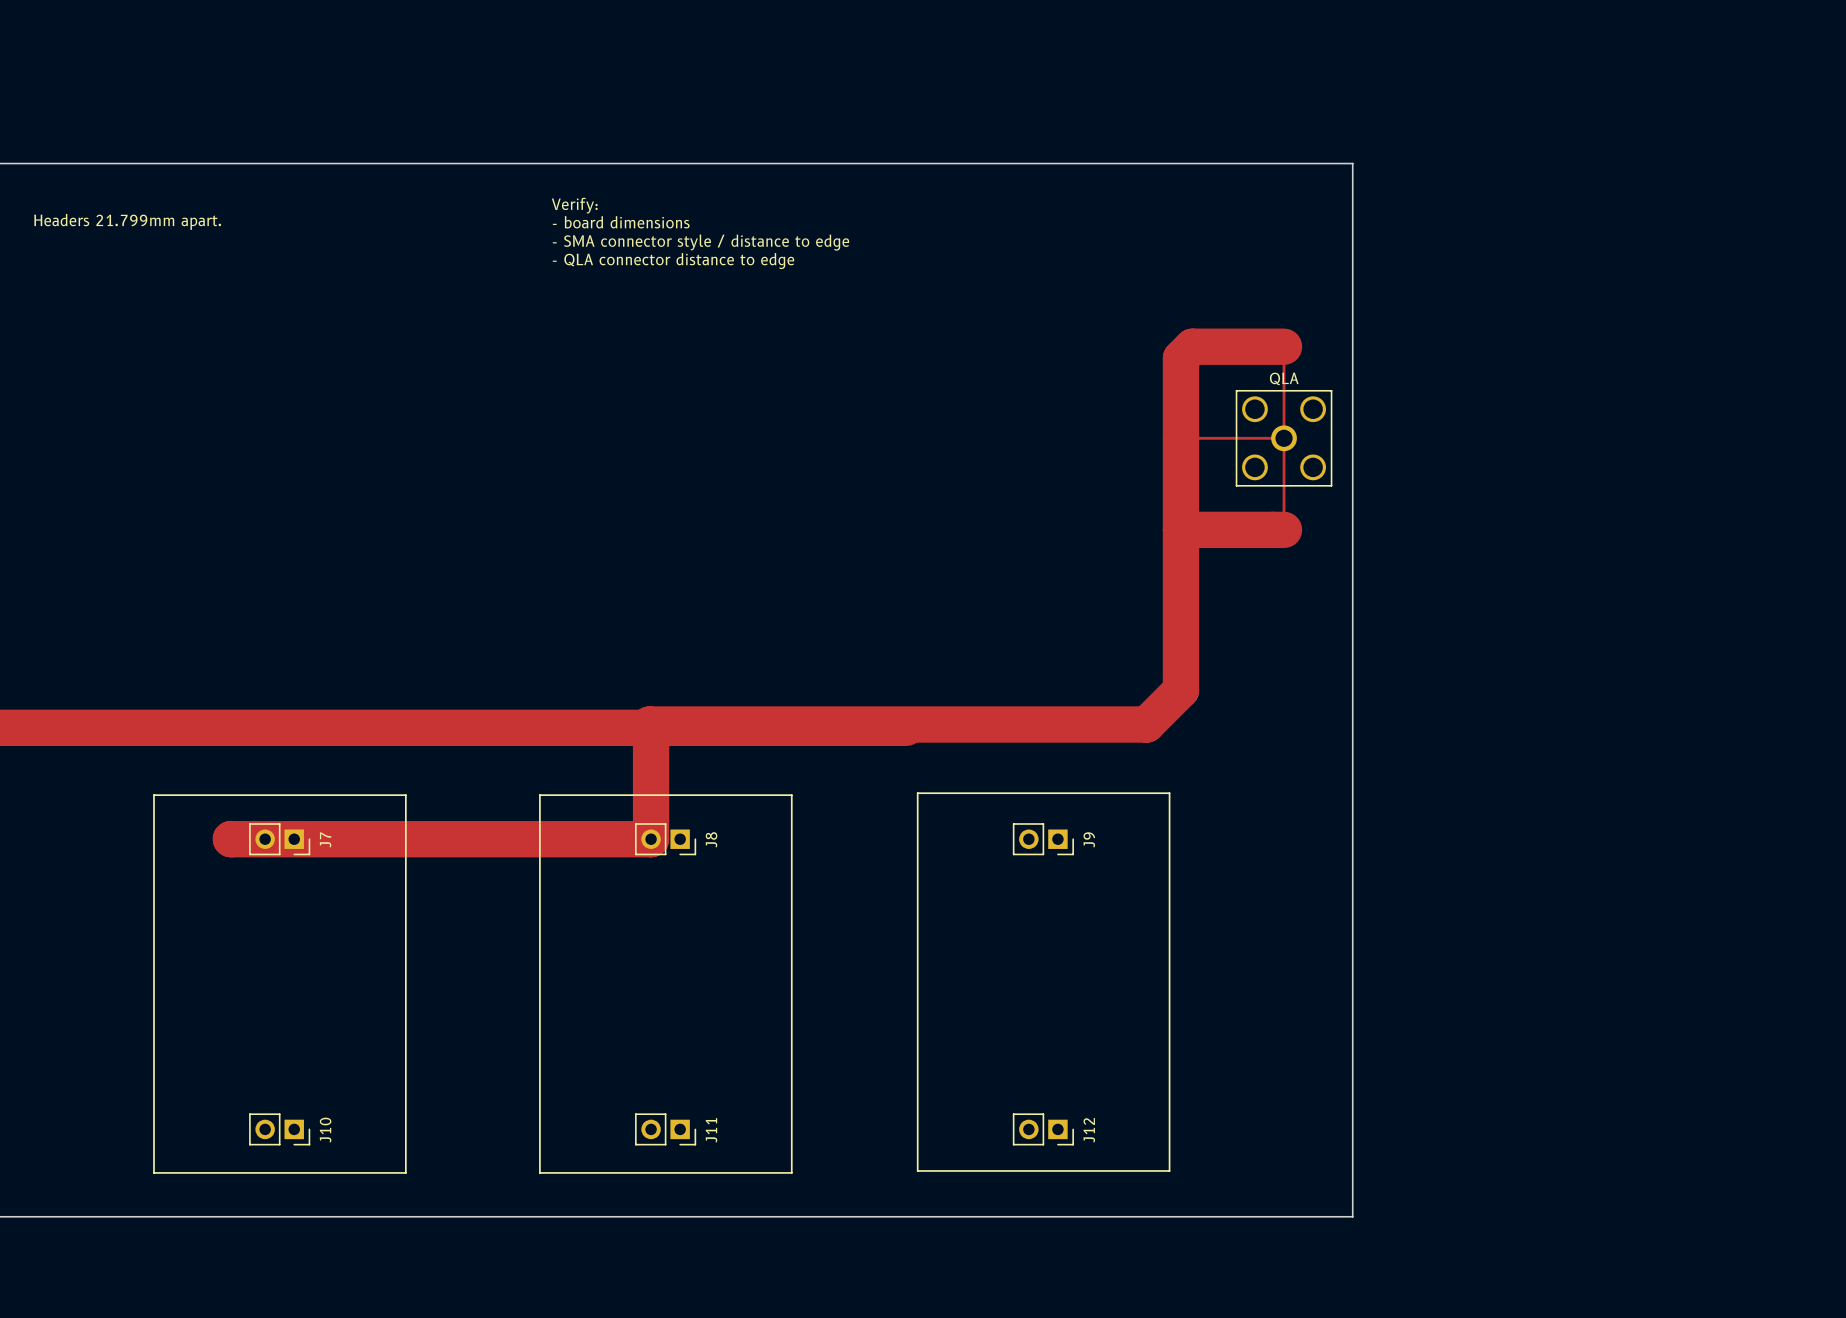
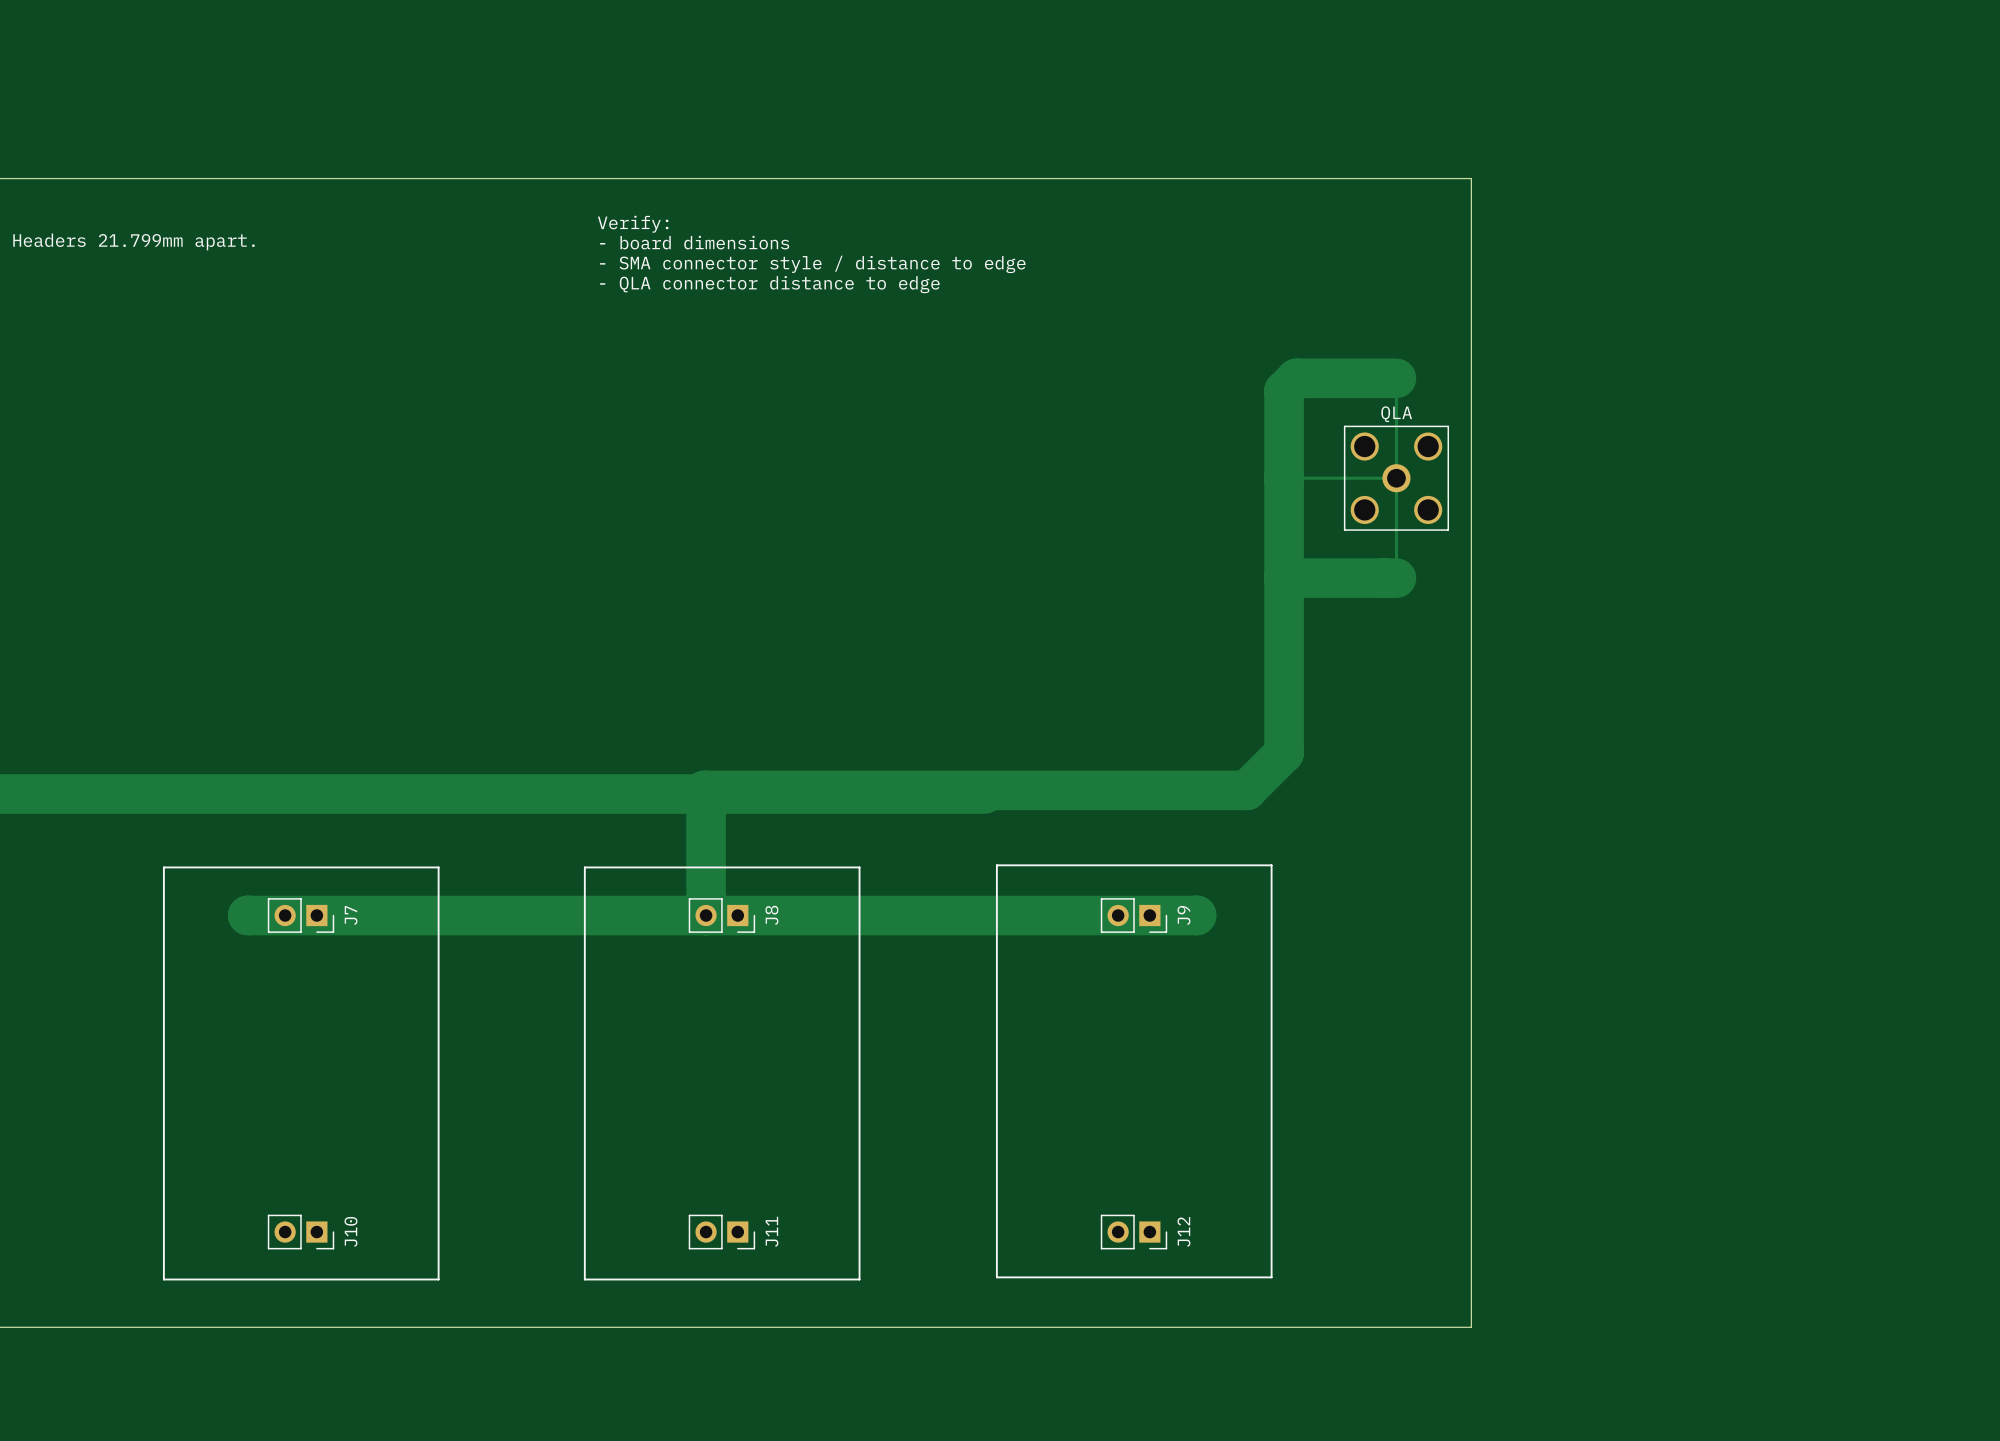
track: none -> (1196, 915) (706, 915)

